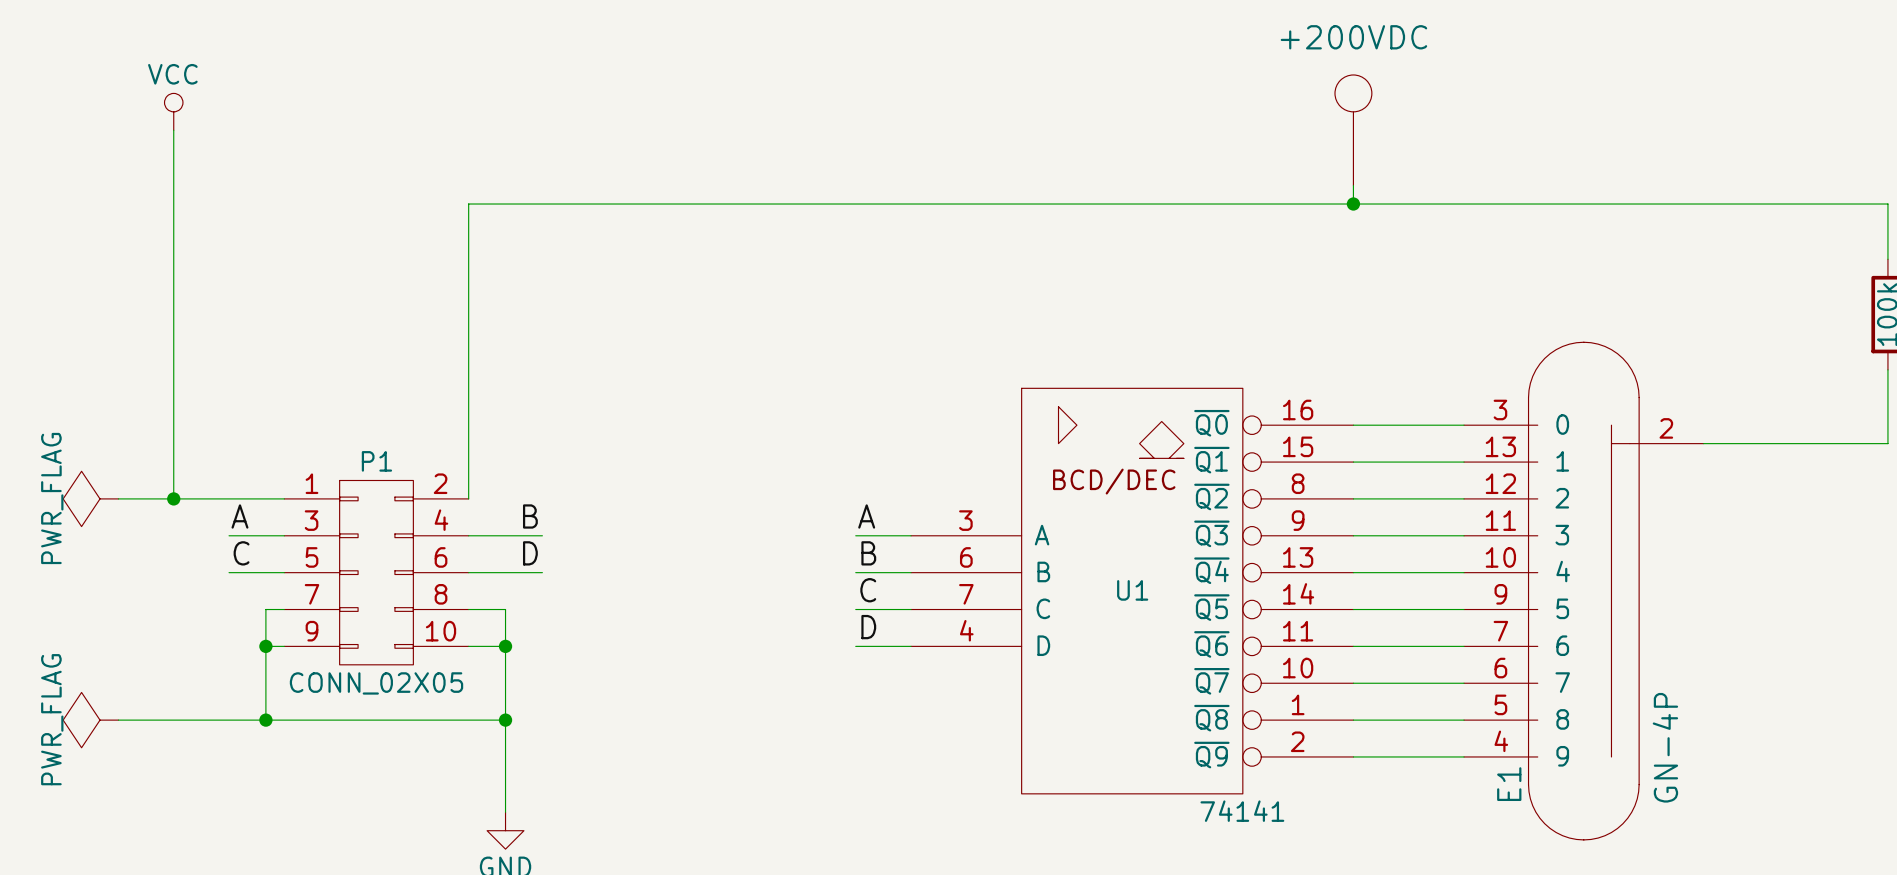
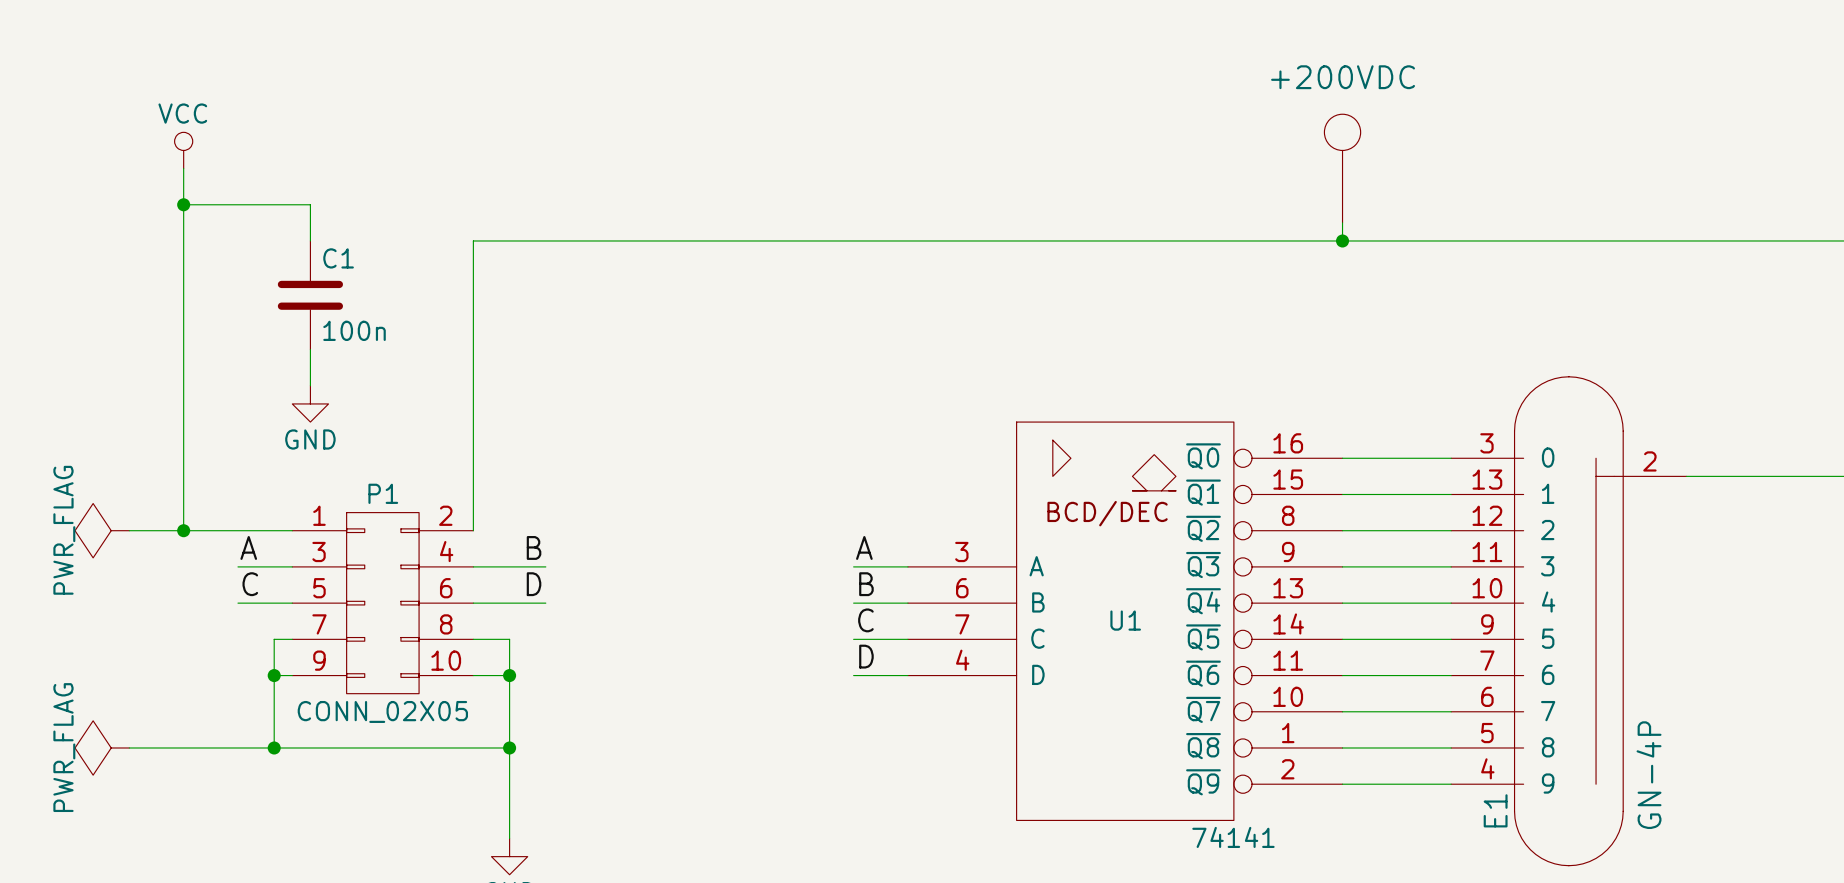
wire: none -> (183, 204) (310, 204) (310, 240)
junction: none -> (183, 204)
C1: none -> 100n (310, 295)
wire: none -> (310, 349) (310, 385)
power symbol: none -> GND (310, 403)

